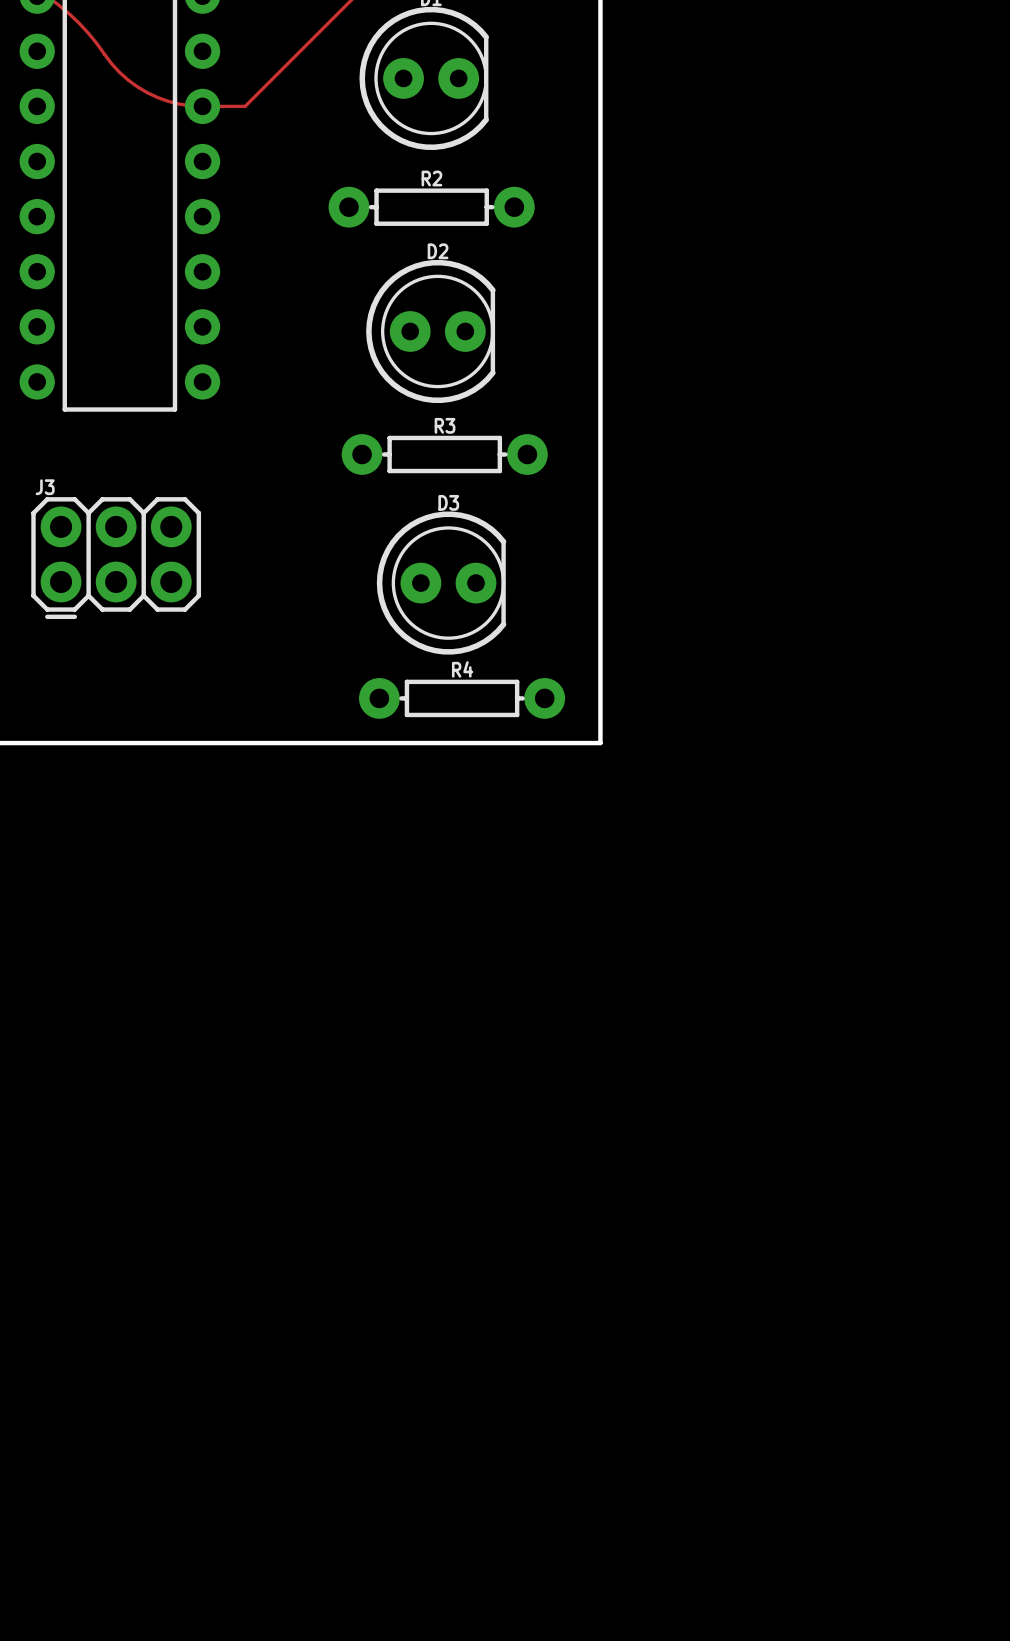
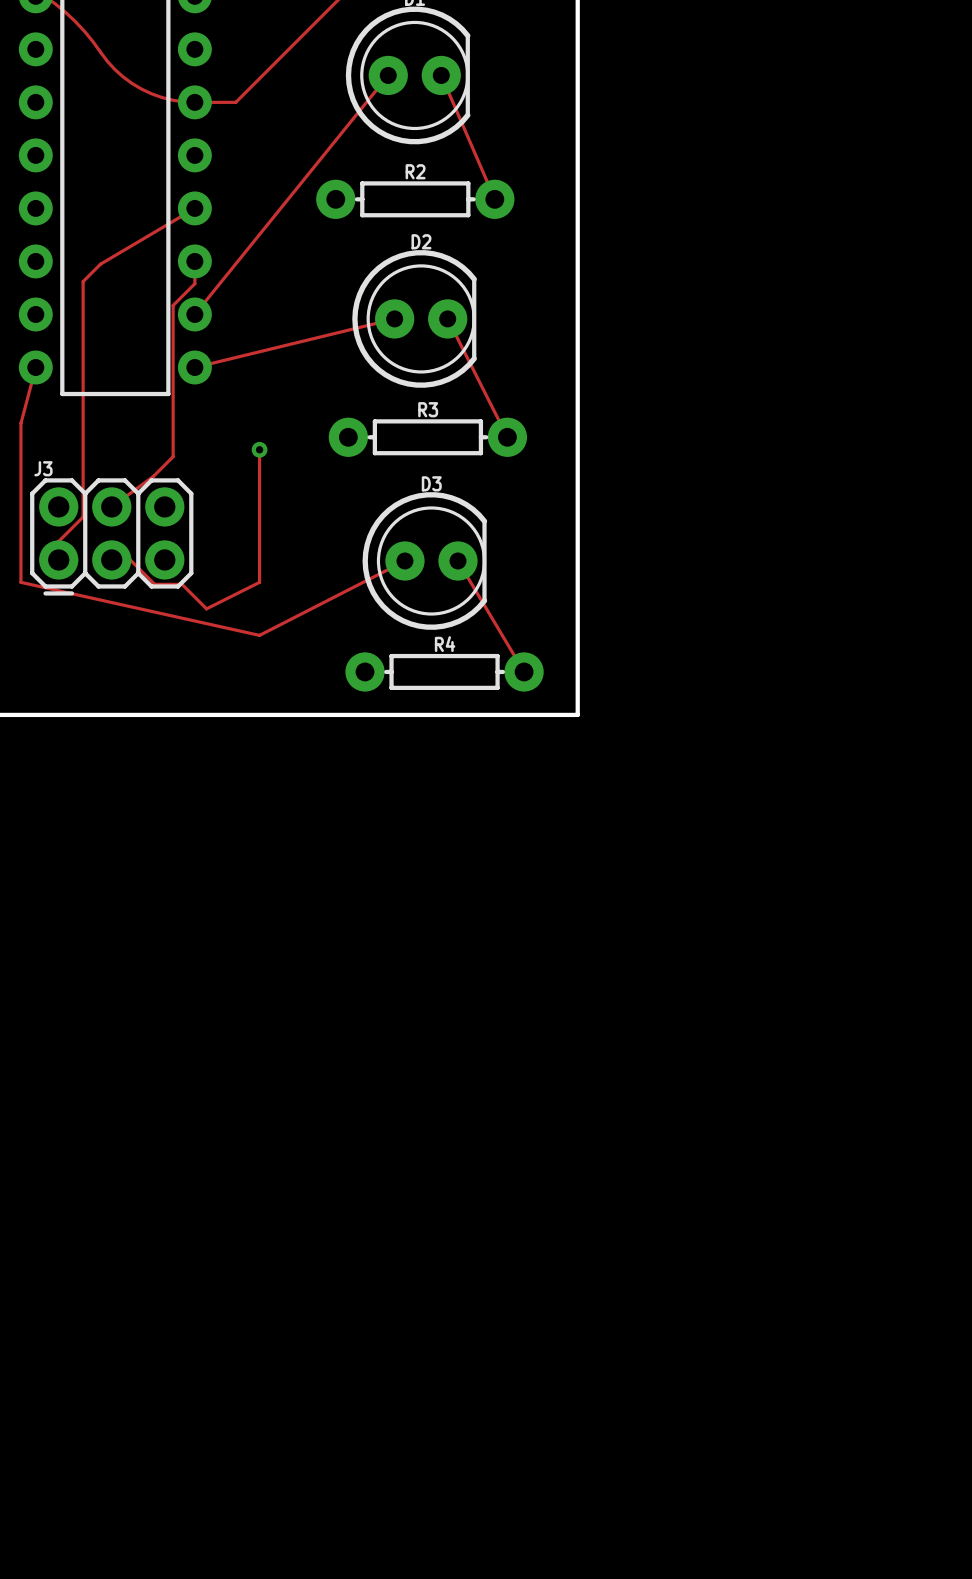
track: none -> (388, 75) (194, 314)
track: none -> (441, 75) (494, 199)
track: none -> (194, 208) (100, 264) (83, 281) (83, 517) (58, 541) (58, 559)
track: none -> (194, 261) (194, 283) (173, 305) (173, 456) (153, 476) (111, 506)
track: none -> (394, 318) (194, 367)
track: none -> (447, 318) (507, 437)
track: none -> (35, 367) (20, 423) (20, 582) (259, 635) (404, 560)
track: none -> (259, 449) (259, 582) (206, 608) (182, 584) (154, 584) (130, 559) (111, 559)
via: none -> (259, 449)
track: none -> (457, 560) (524, 671)

